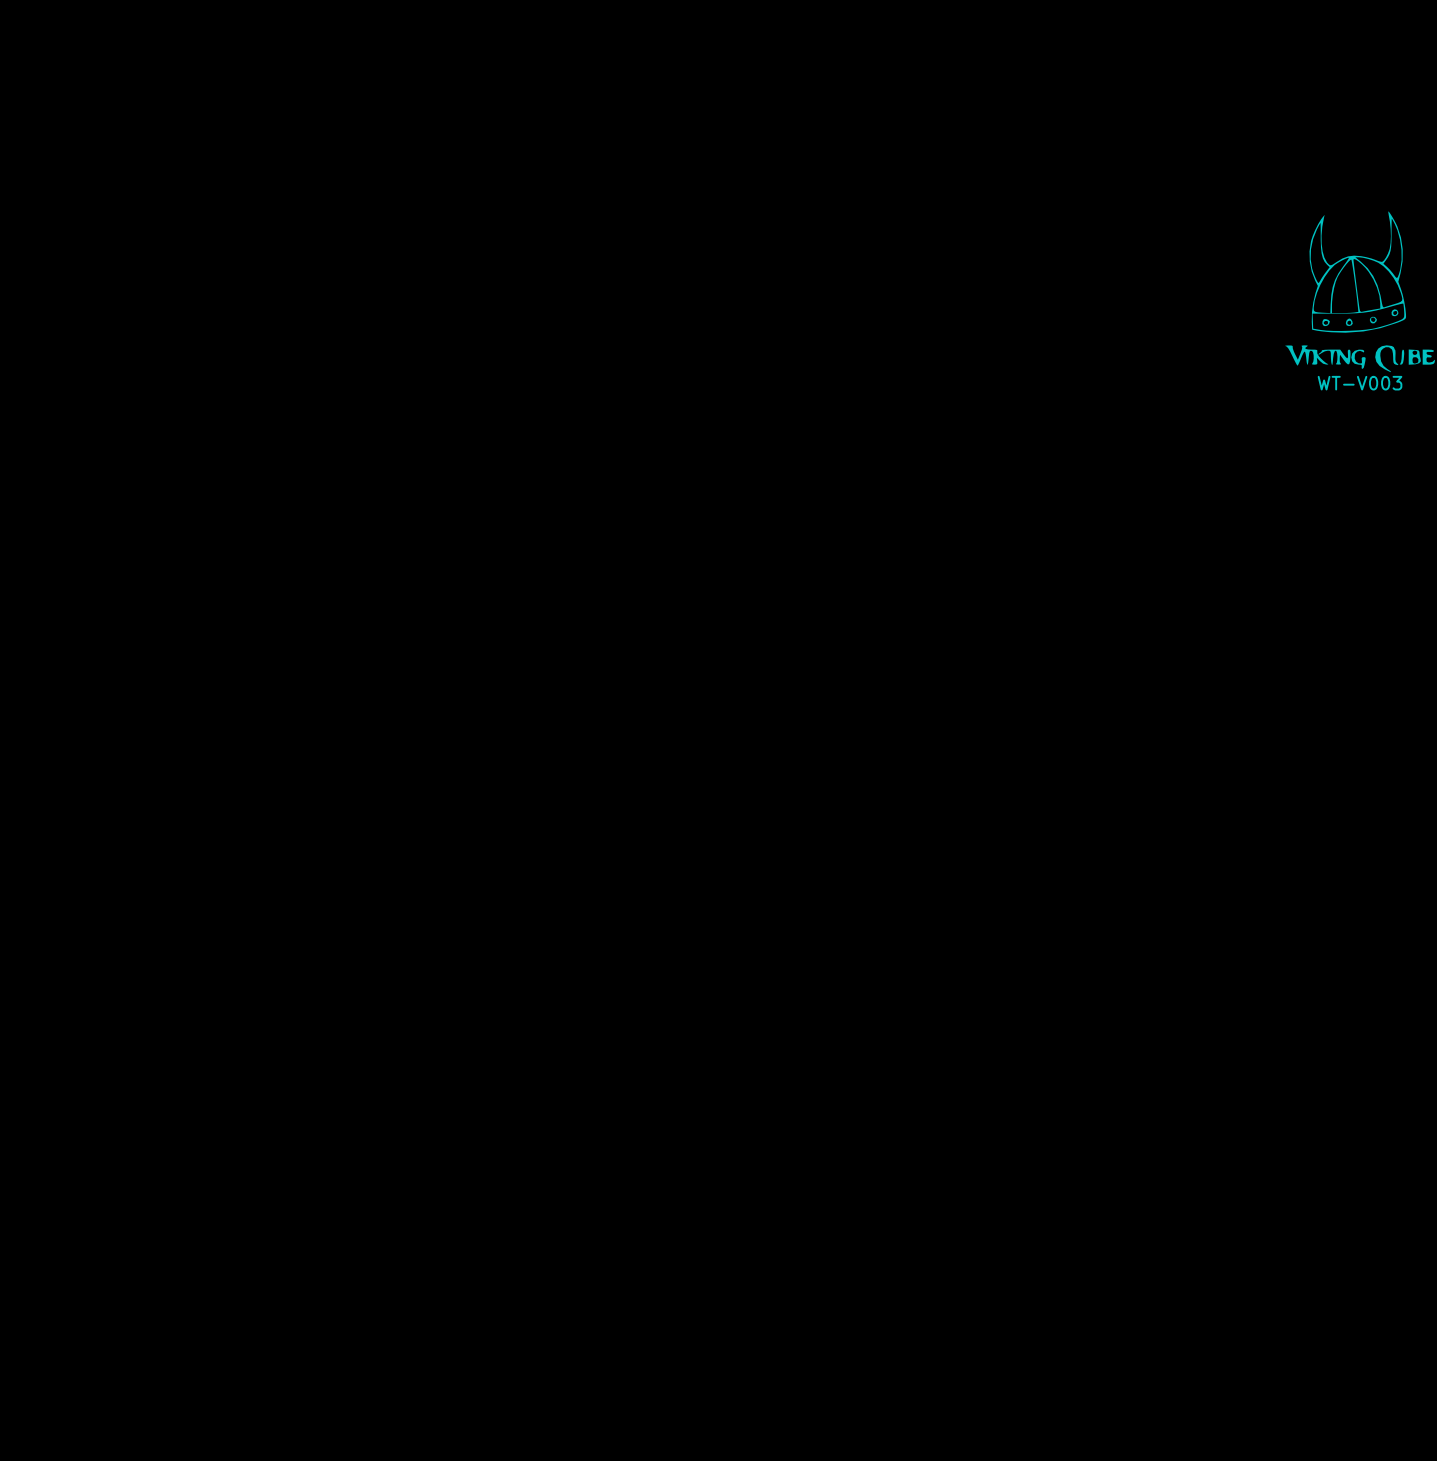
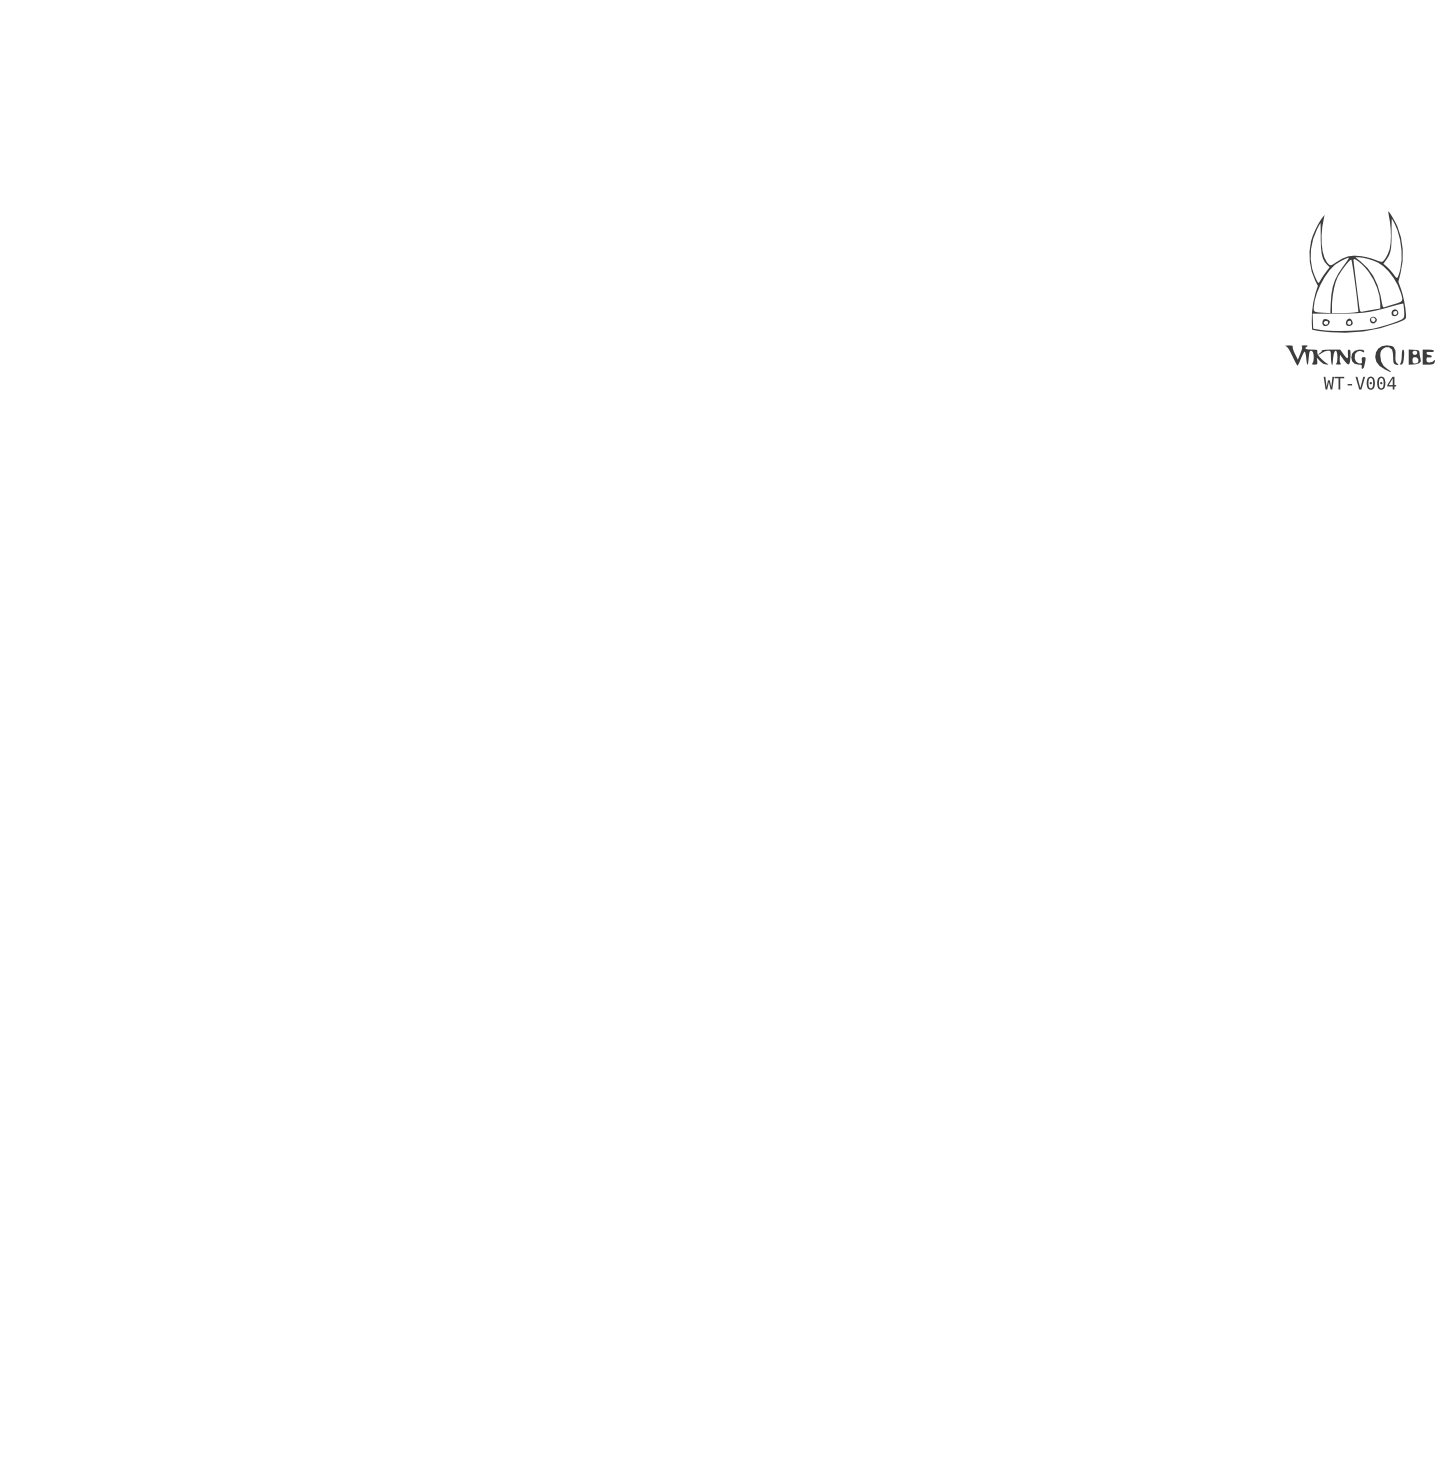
text: WT-V003 (1360, 383) -> WT-V004 (1359, 383)

